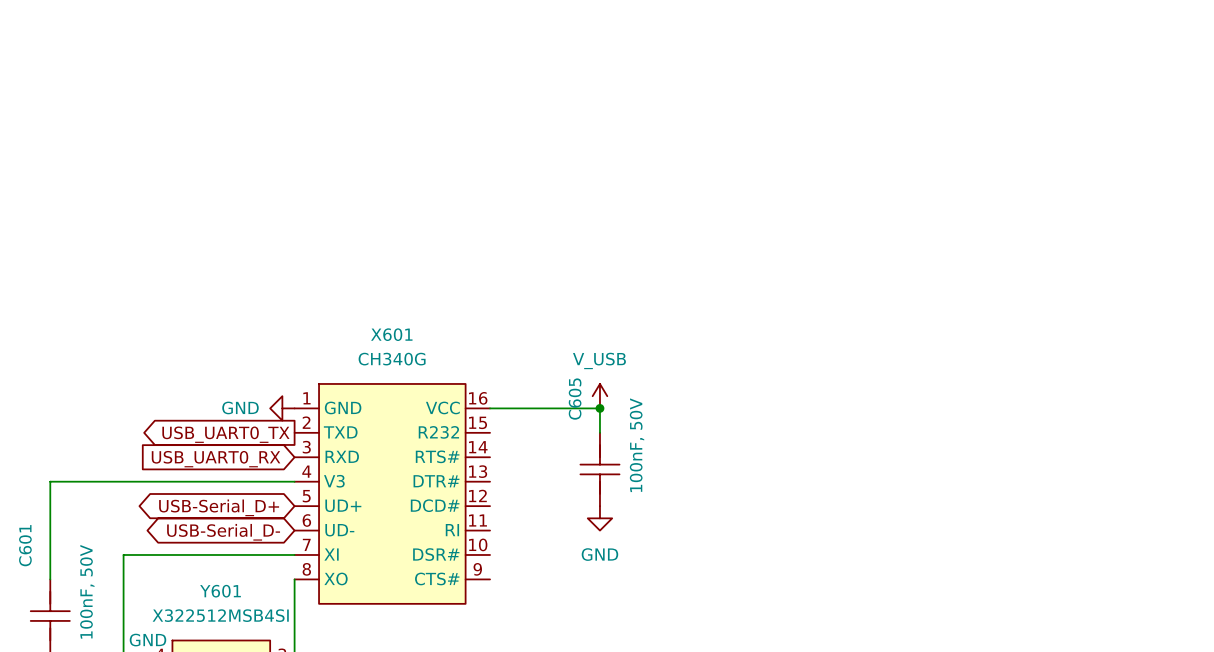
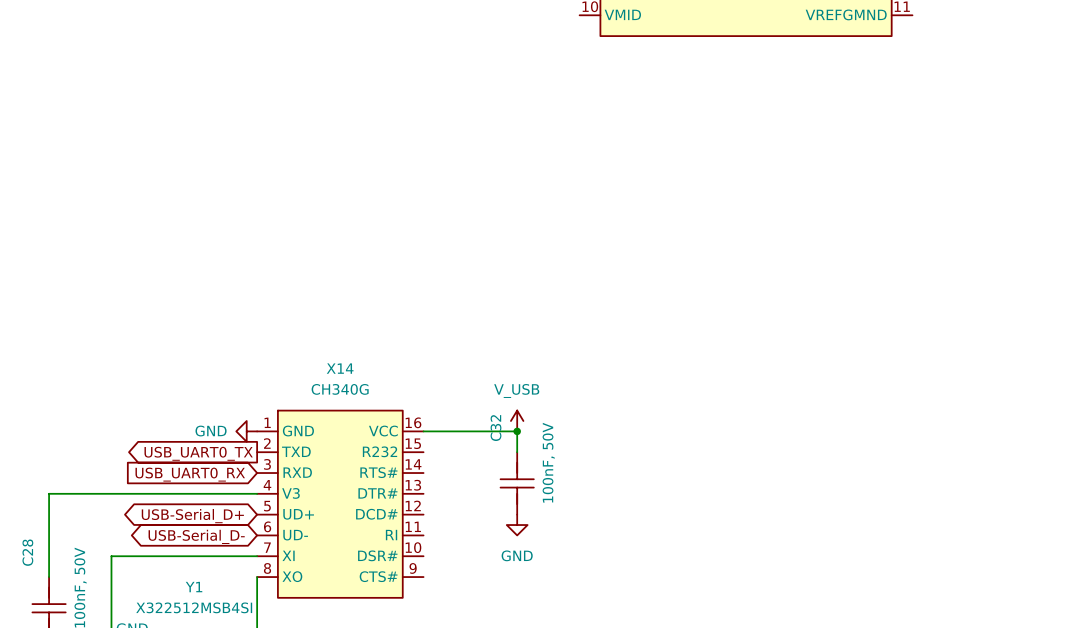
X601 name: X601 (391, 334) -> X14 (340, 368)
C605 name: C605 (575, 399) -> C32 (496, 428)
C601 name: C601 (25, 545) -> C28 (27, 552)
Y601 name: Y601 (220, 591) -> Y1 (194, 587)

